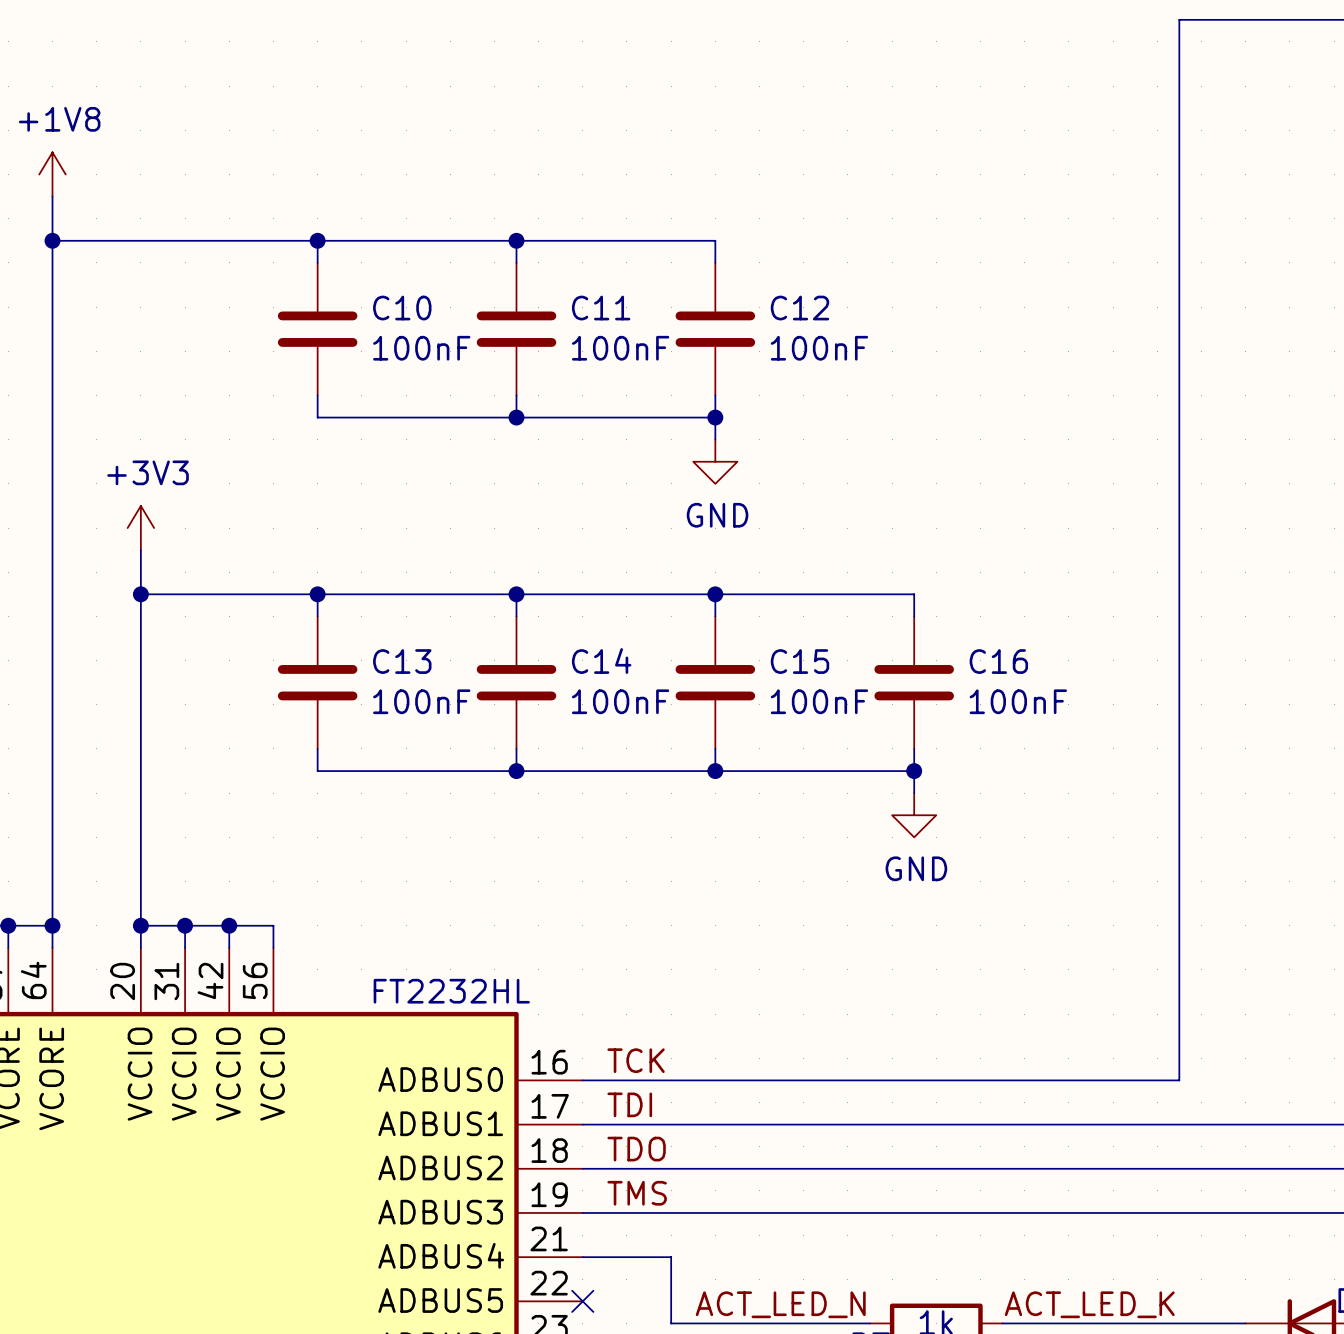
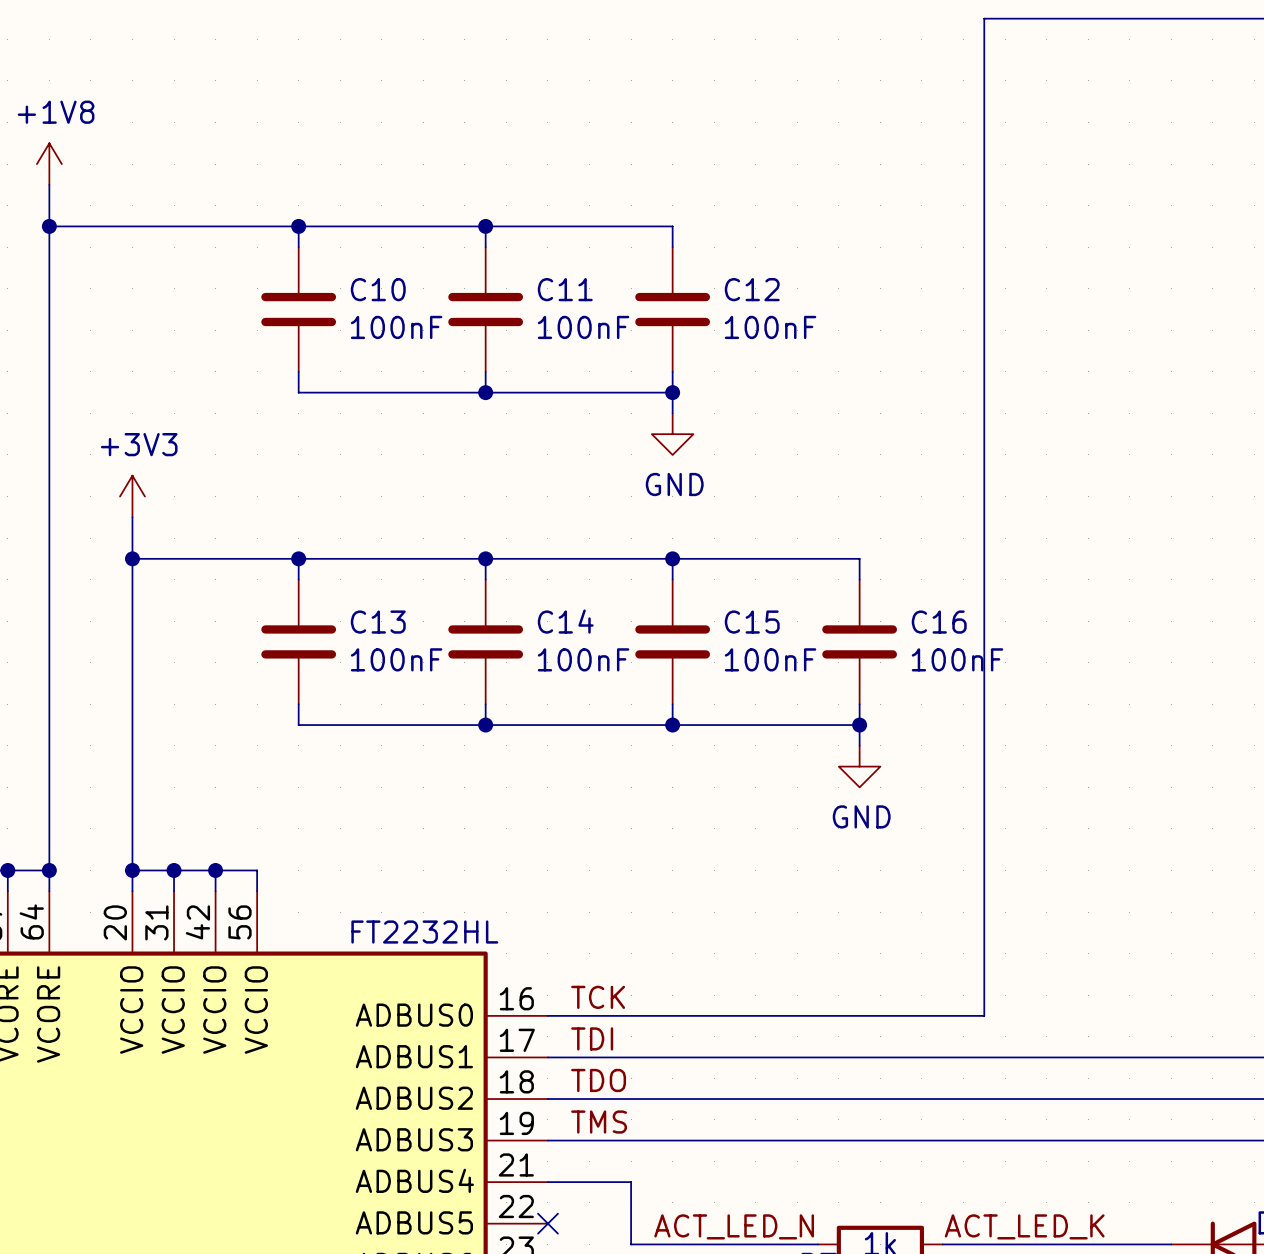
wire: (1179, 19) (1179, 1080) (1046, 1080) -> (1108, 18) (984, 18) (984, 1015)

